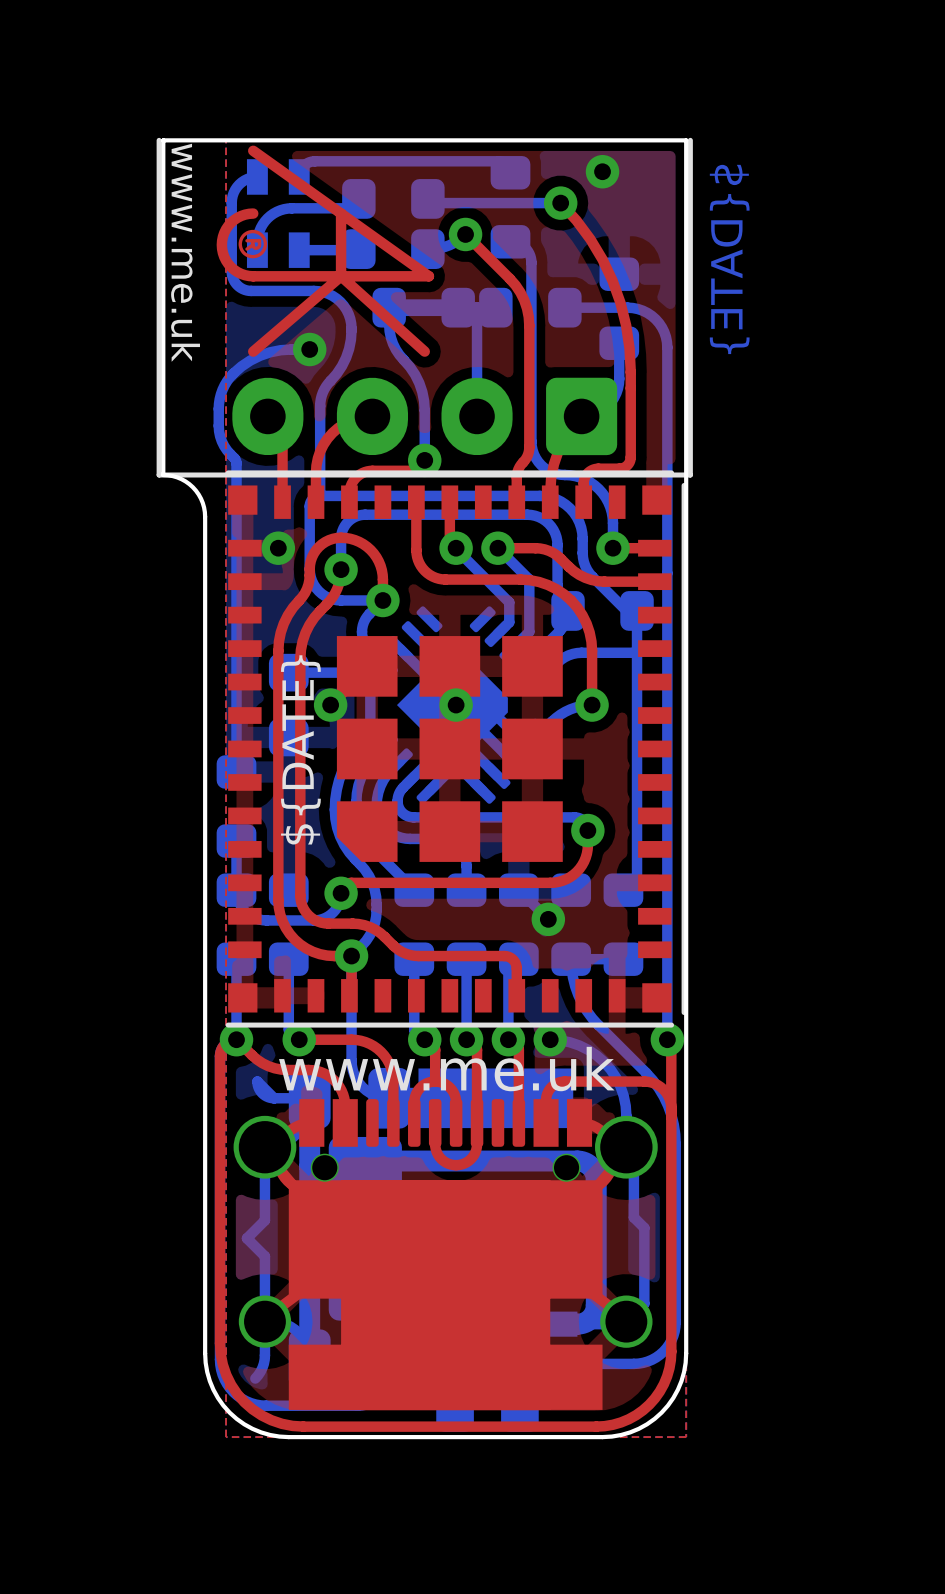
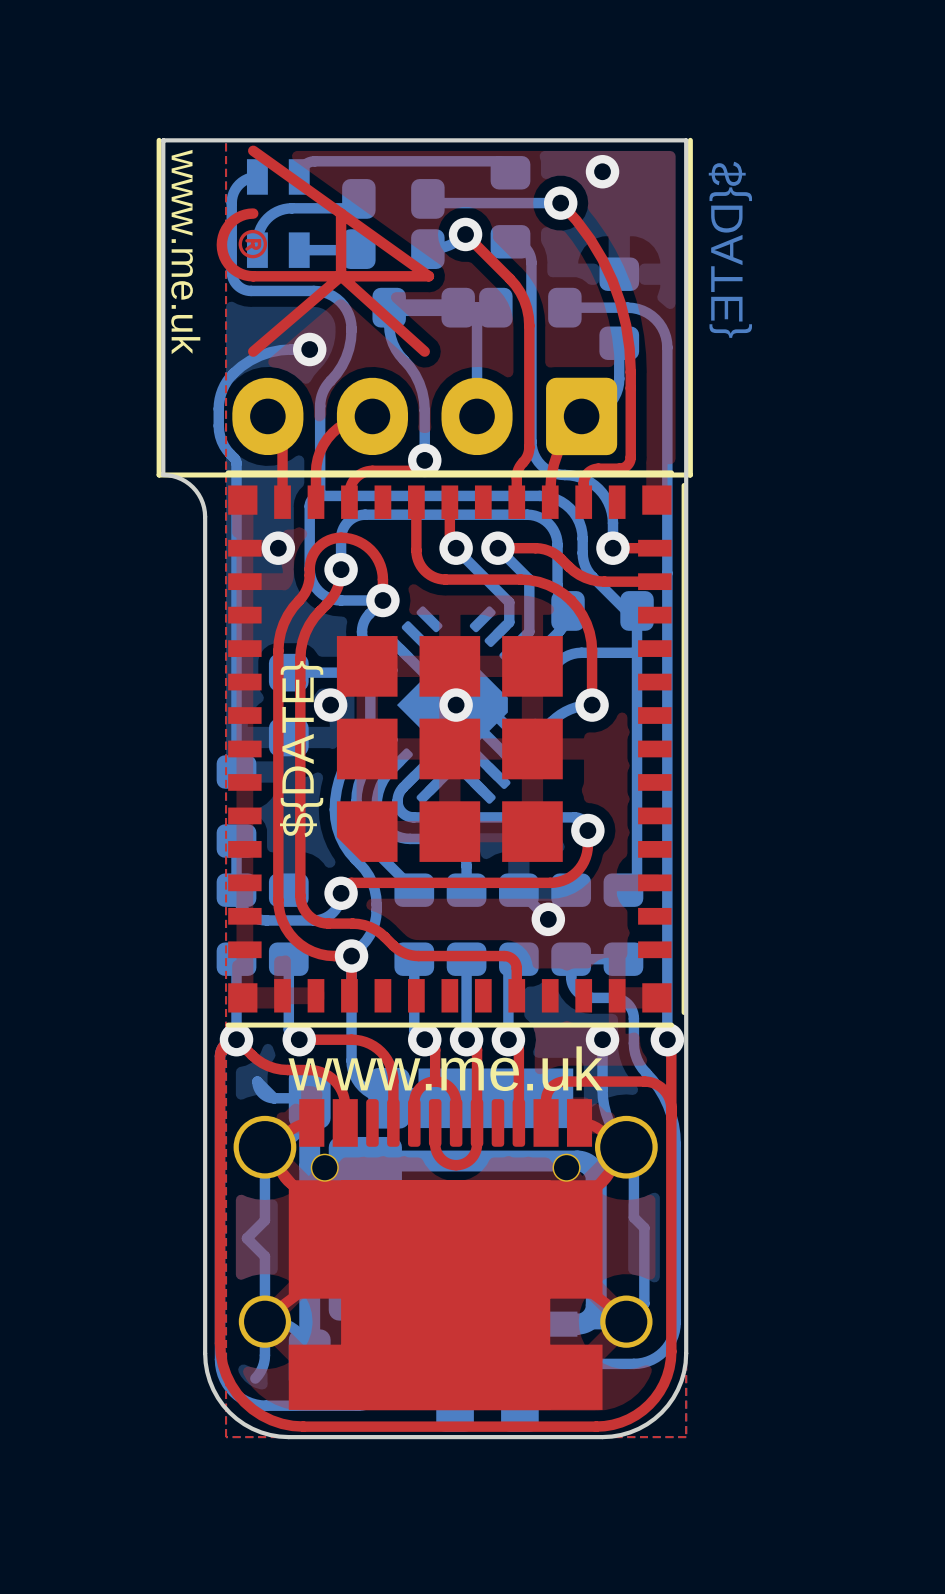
bottom track: (571, 959) (575, 986) (586, 1011) (646, 1072) -> (571, 959) (571, 982) (579, 993) (589, 997) (618, 998) (625, 1002) (631, 1008) (633, 1016) (635, 1054) (646, 1072)
bottom track: (550, 1039) (569, 1042) (588, 1049) (610, 1069) (623, 1096) (626, 1115) (626, 1147) -> (602, 1039) (604, 1105) (612, 1128) (626, 1147)
via position: (550, 1039) -> (602, 1039)

